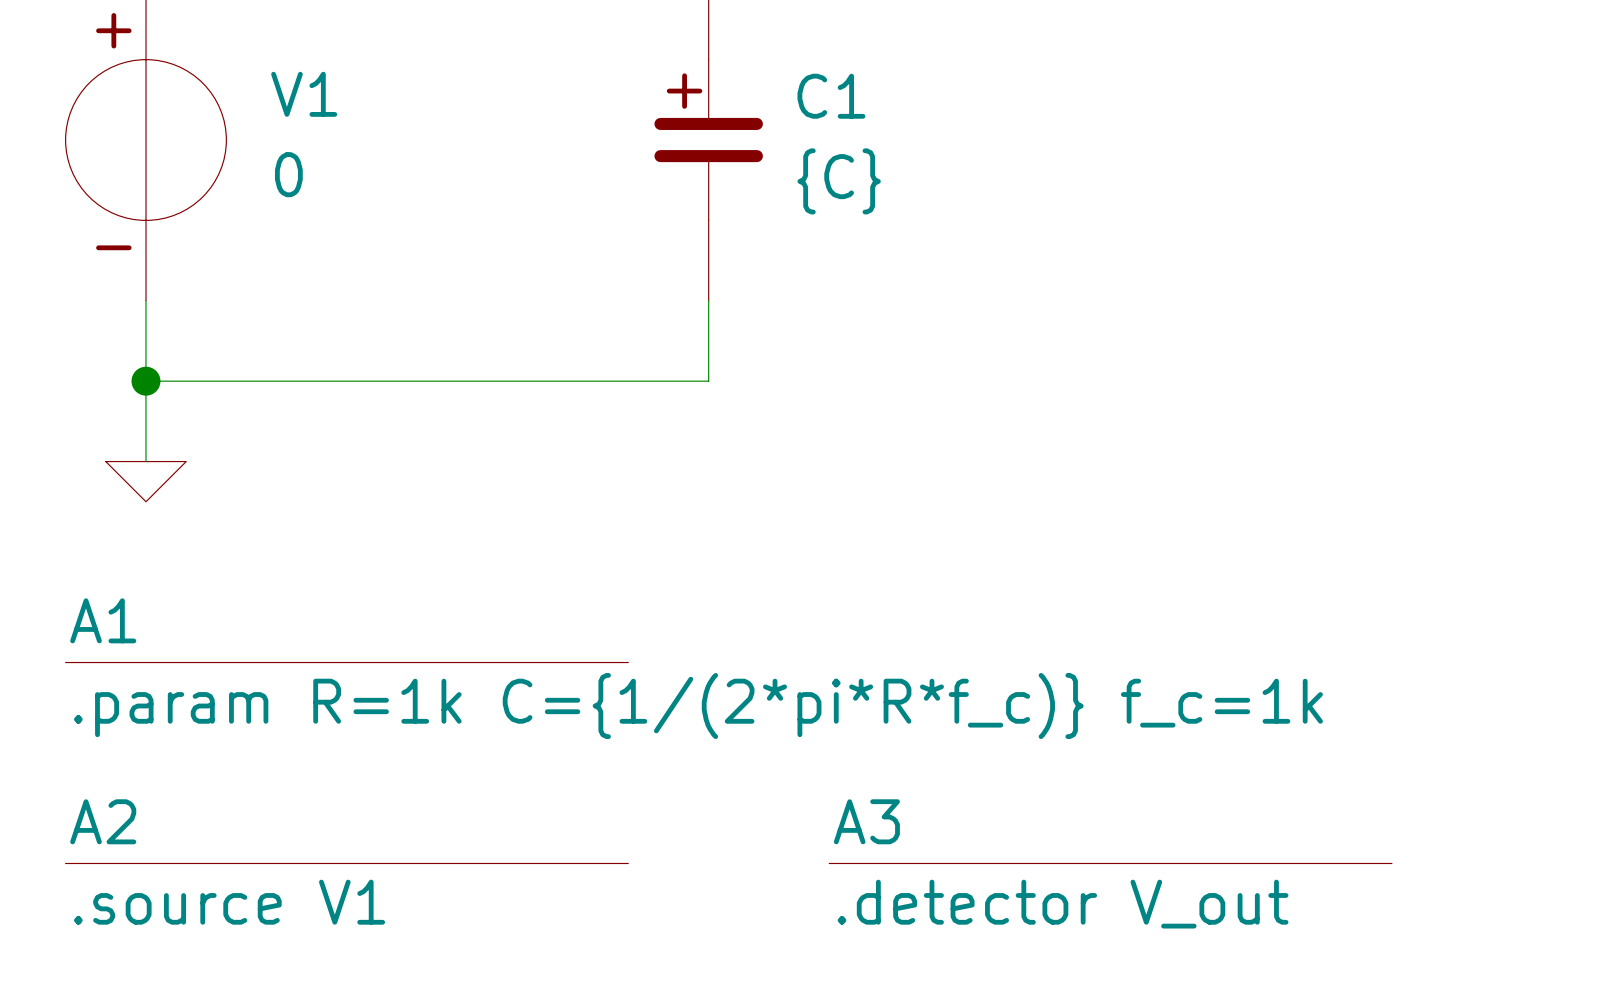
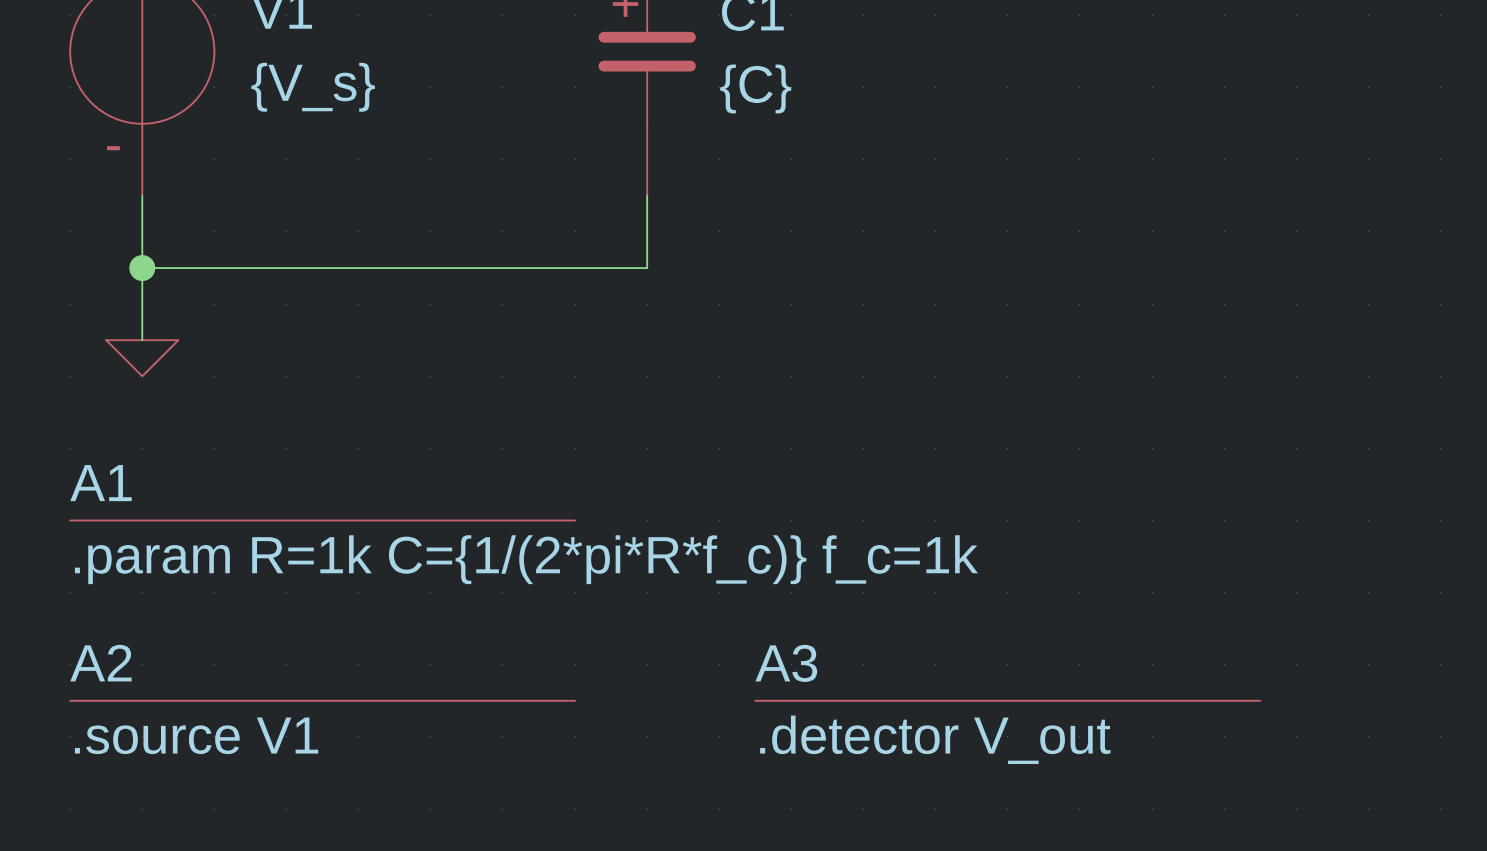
V1 value: 0 (288, 174) -> {V_s} (313, 87)

